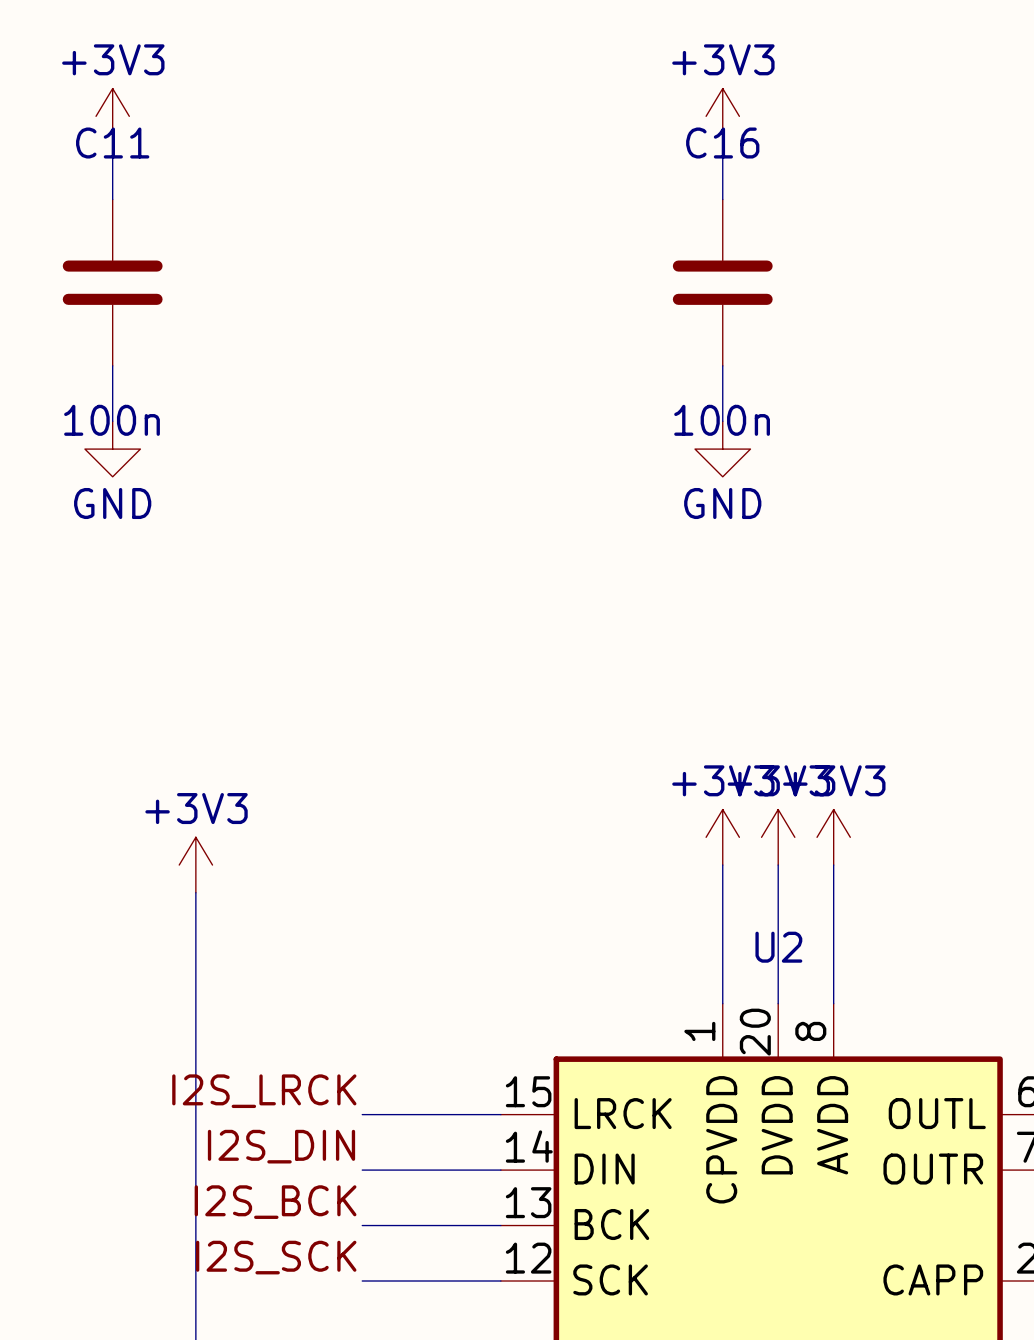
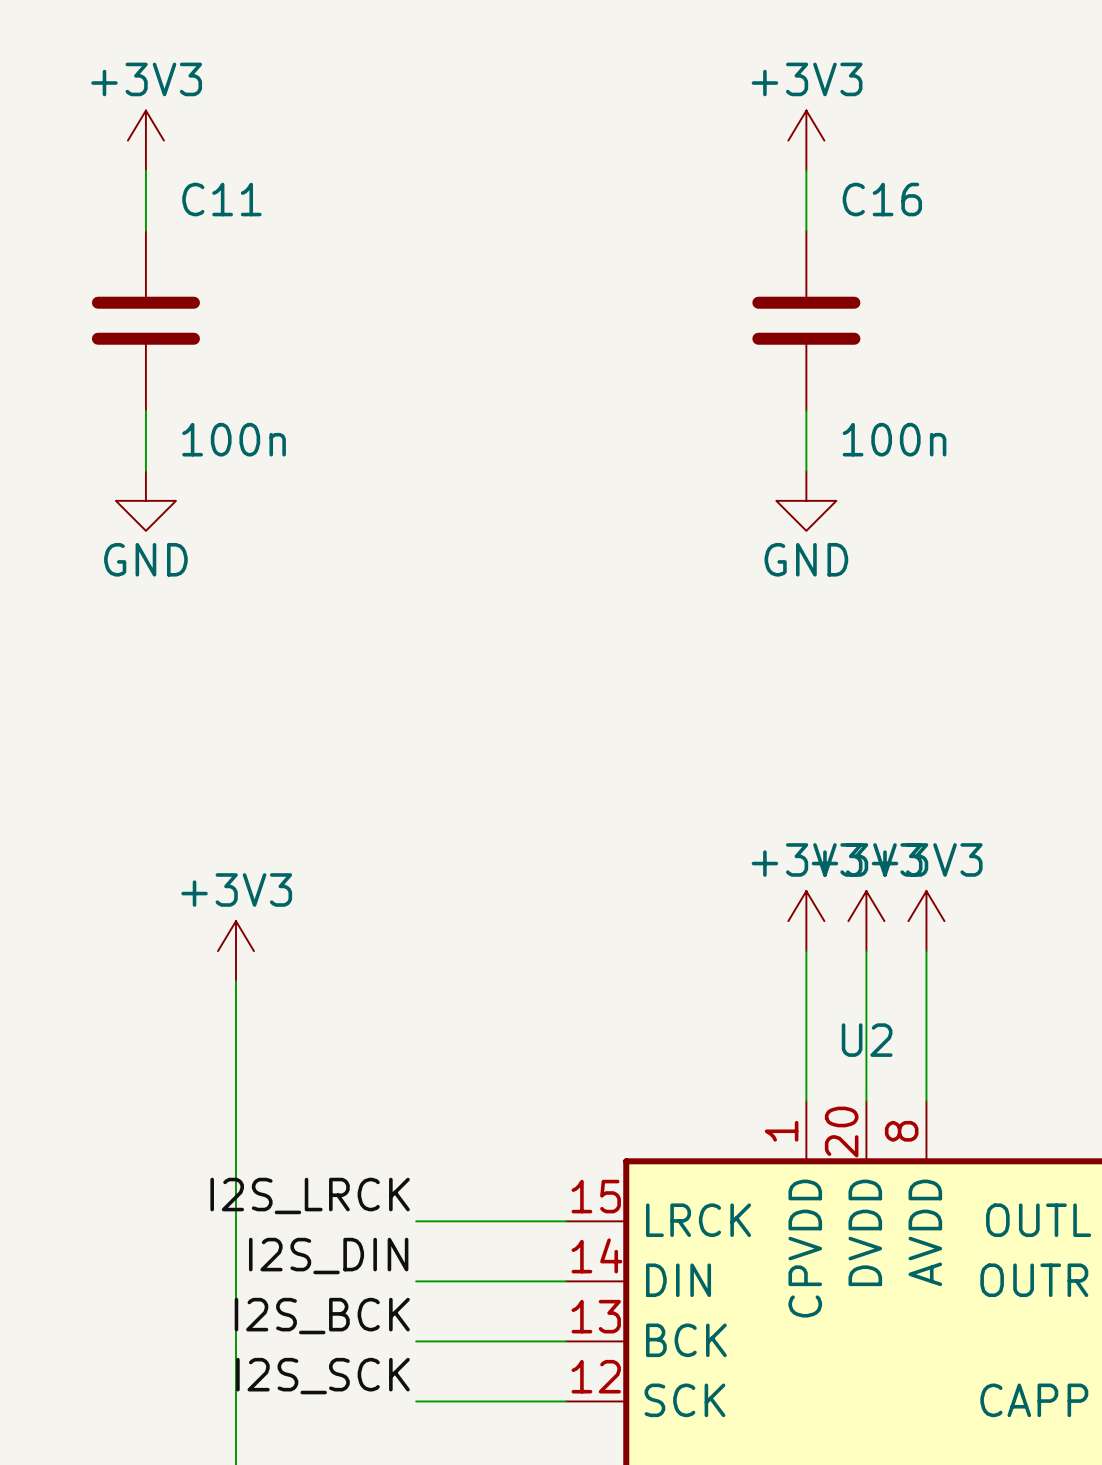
C11 name position: C11 (112, 143) -> C11 (221, 199)
C16 name position: C16 (722, 143) -> C16 (882, 199)
C11 value position: 100n (112, 420) -> 100n (234, 439)
C16 value position: 100n (722, 420) -> 100n (894, 439)

